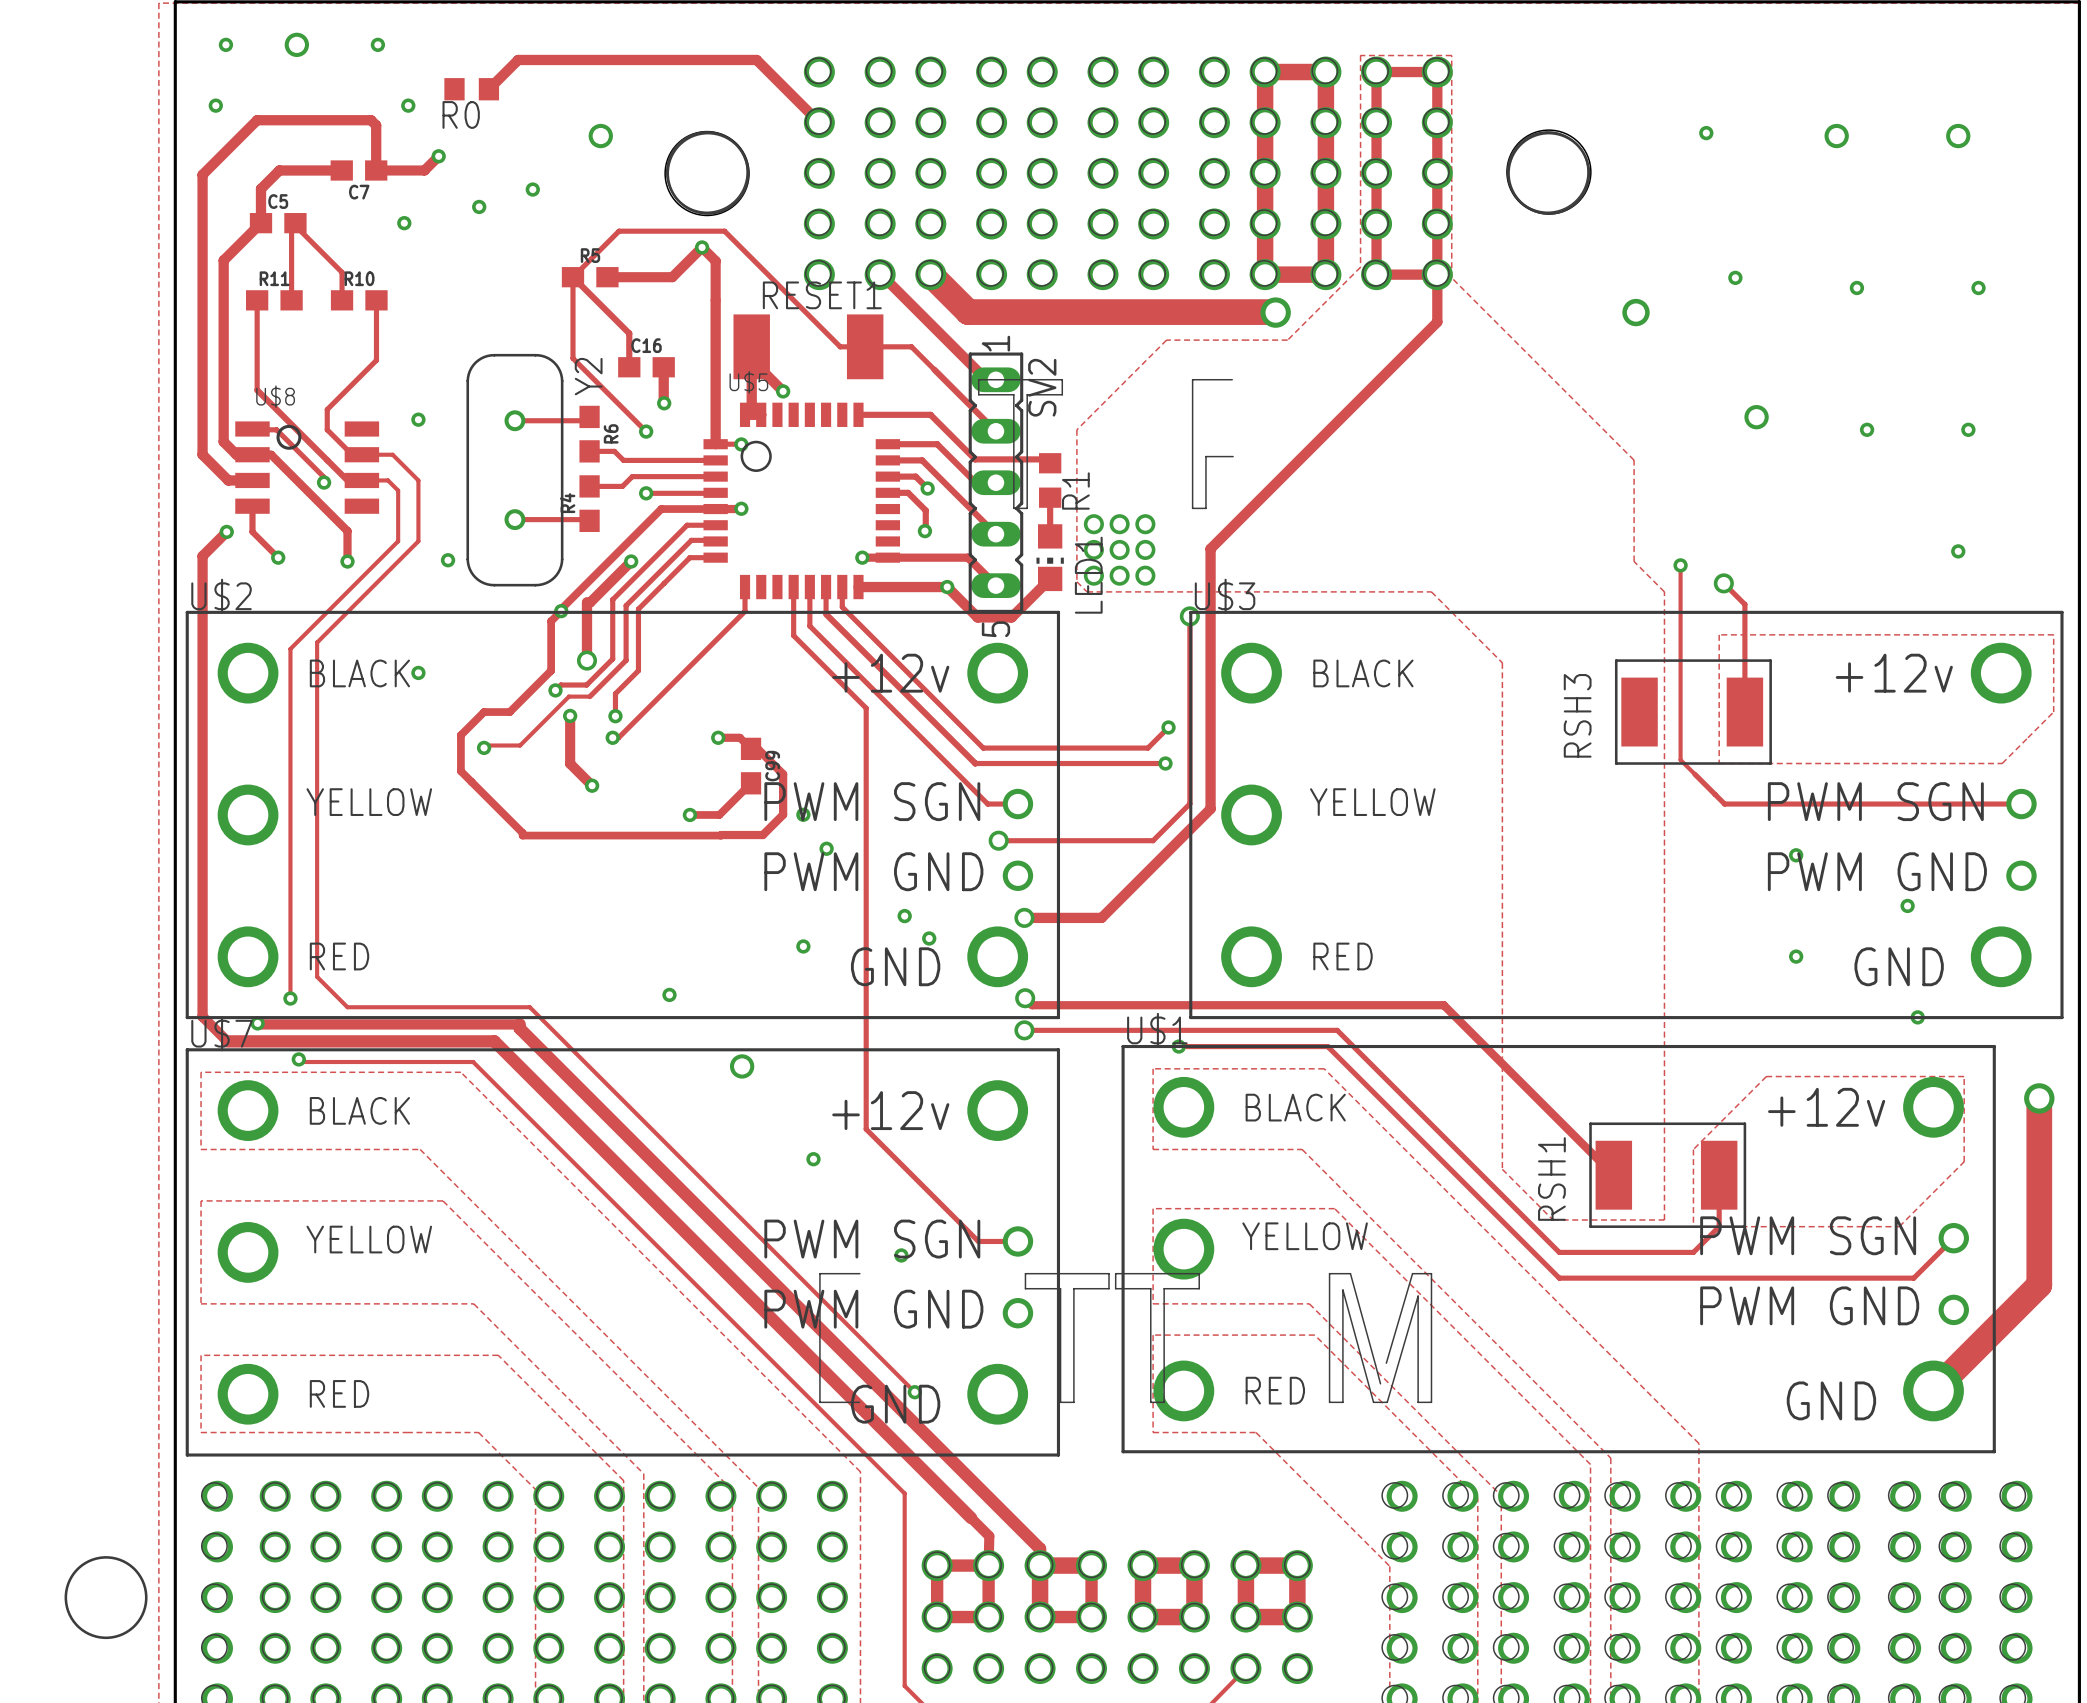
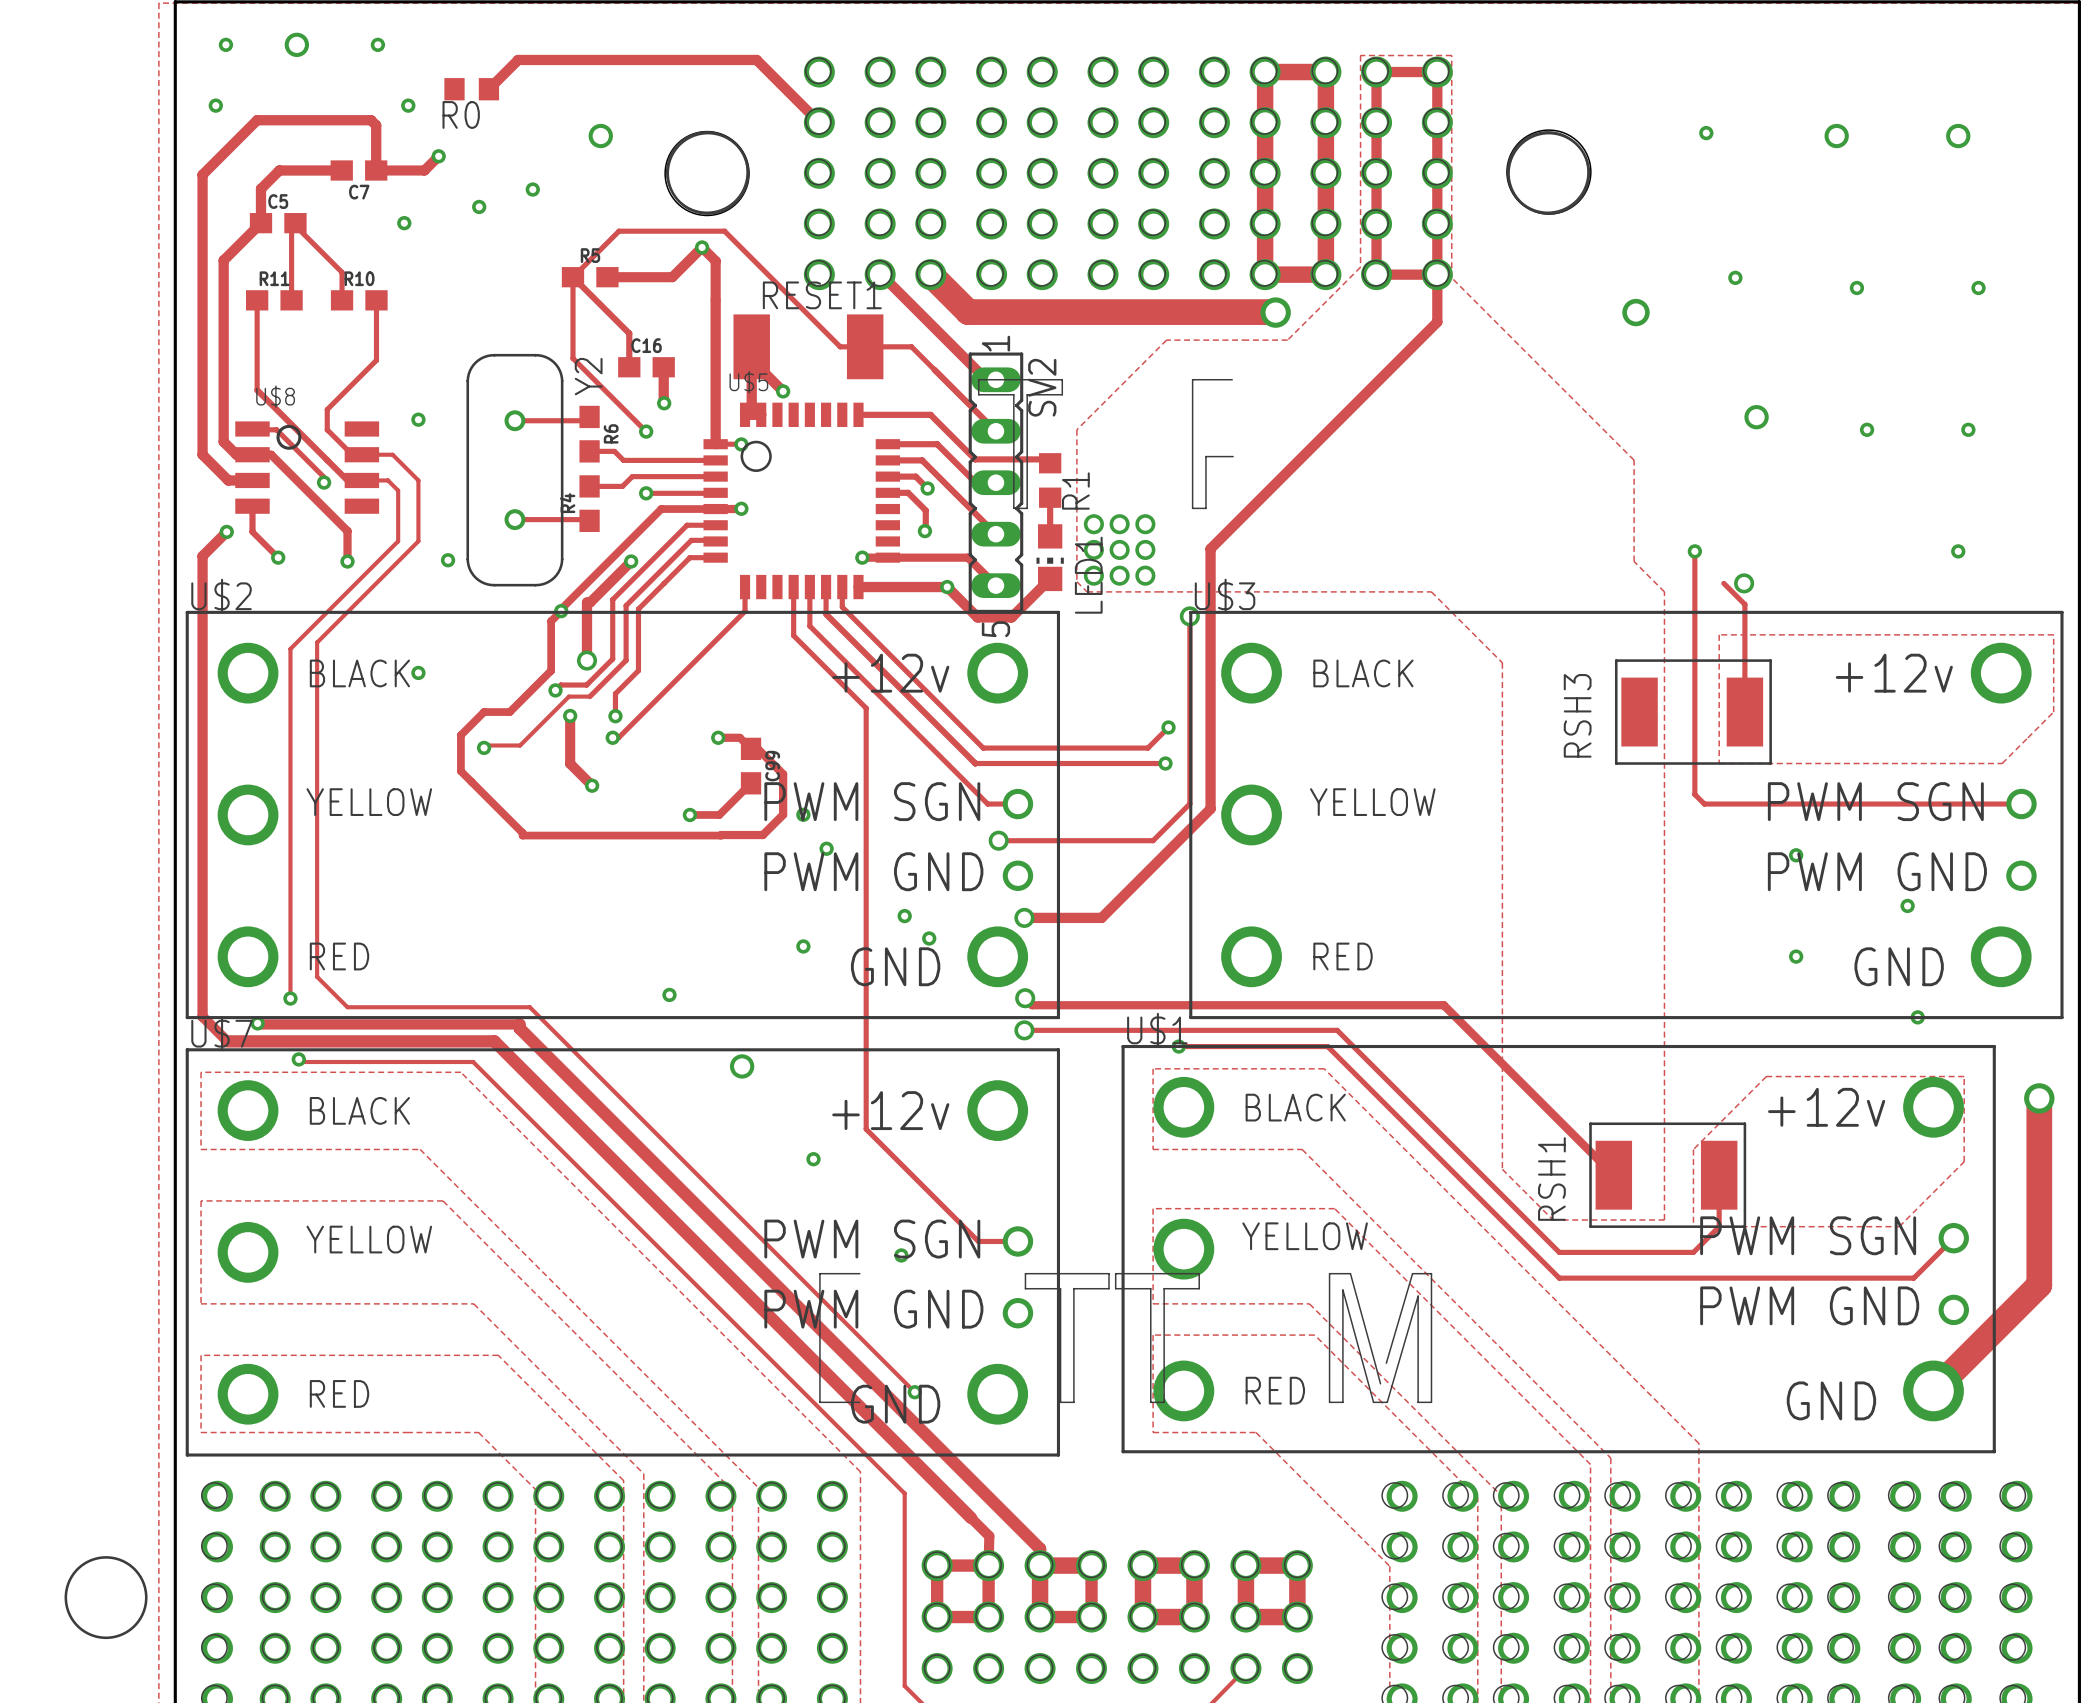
track: (1680, 565) (1680, 759) (1715, 794) -> none
via position: (1680, 565) -> (1694, 551)
via position: (1723, 583) -> (1744, 583)
track: (1694, 774) (1724, 804) -> (1694, 551) (1694, 794) (1704, 804) (1724, 804)

